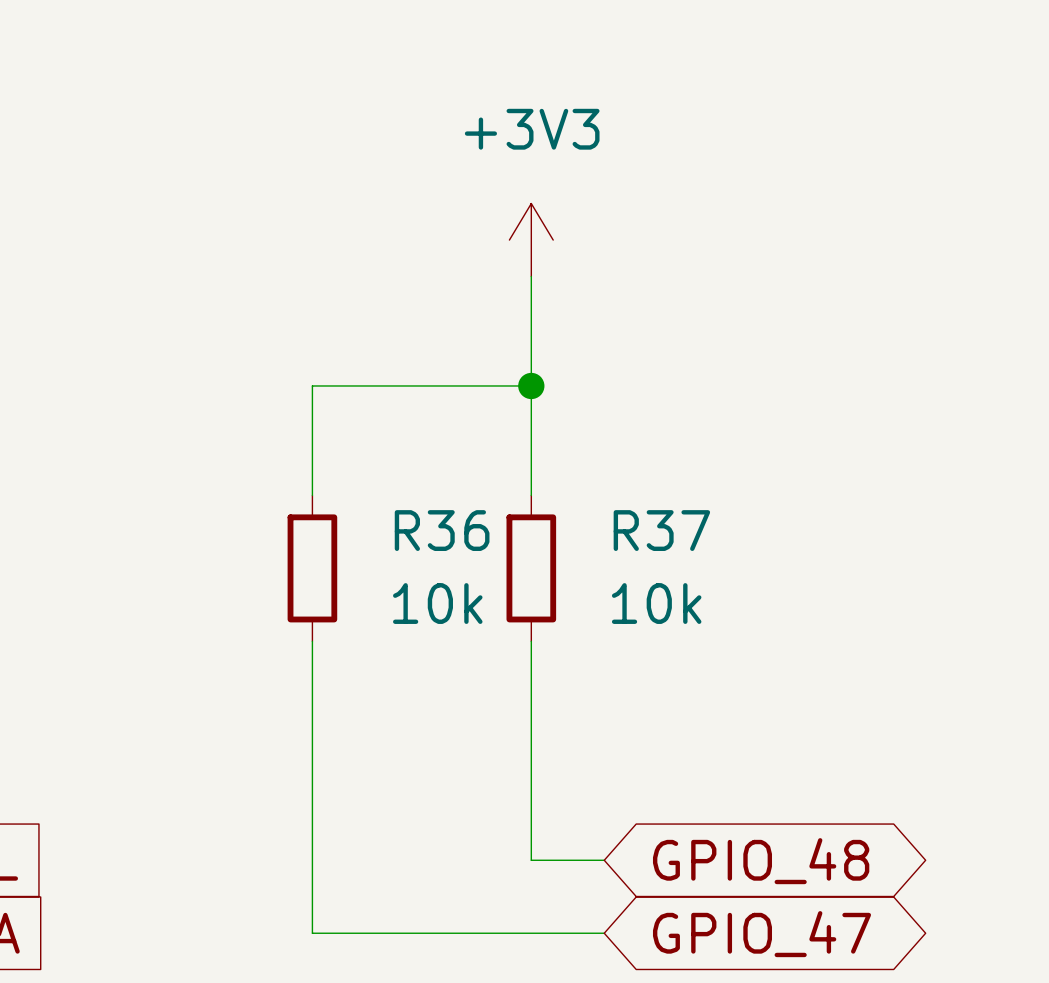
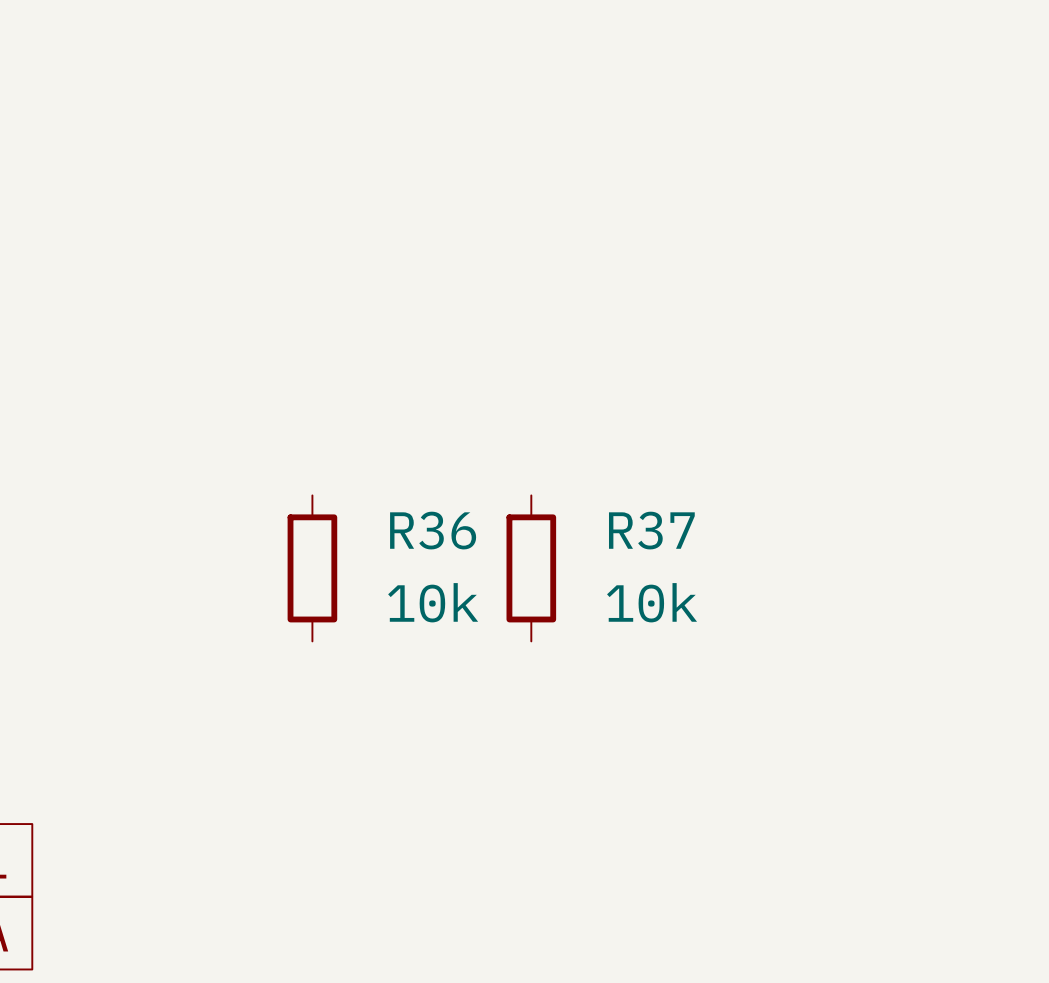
power symbol: +3V3 (531, 240) -> none
wire: (531, 276) (531, 495) -> none
wire: (531, 385) (312, 385) (312, 495) -> none
junction: (531, 385) -> none
wire: (312, 641) (312, 933) (604, 933) -> none
wire: (531, 641) (531, 860) (604, 860) -> none
global label: GPIO_48 (761, 861) -> none
global label: GPIO_47 (762, 934) -> none

